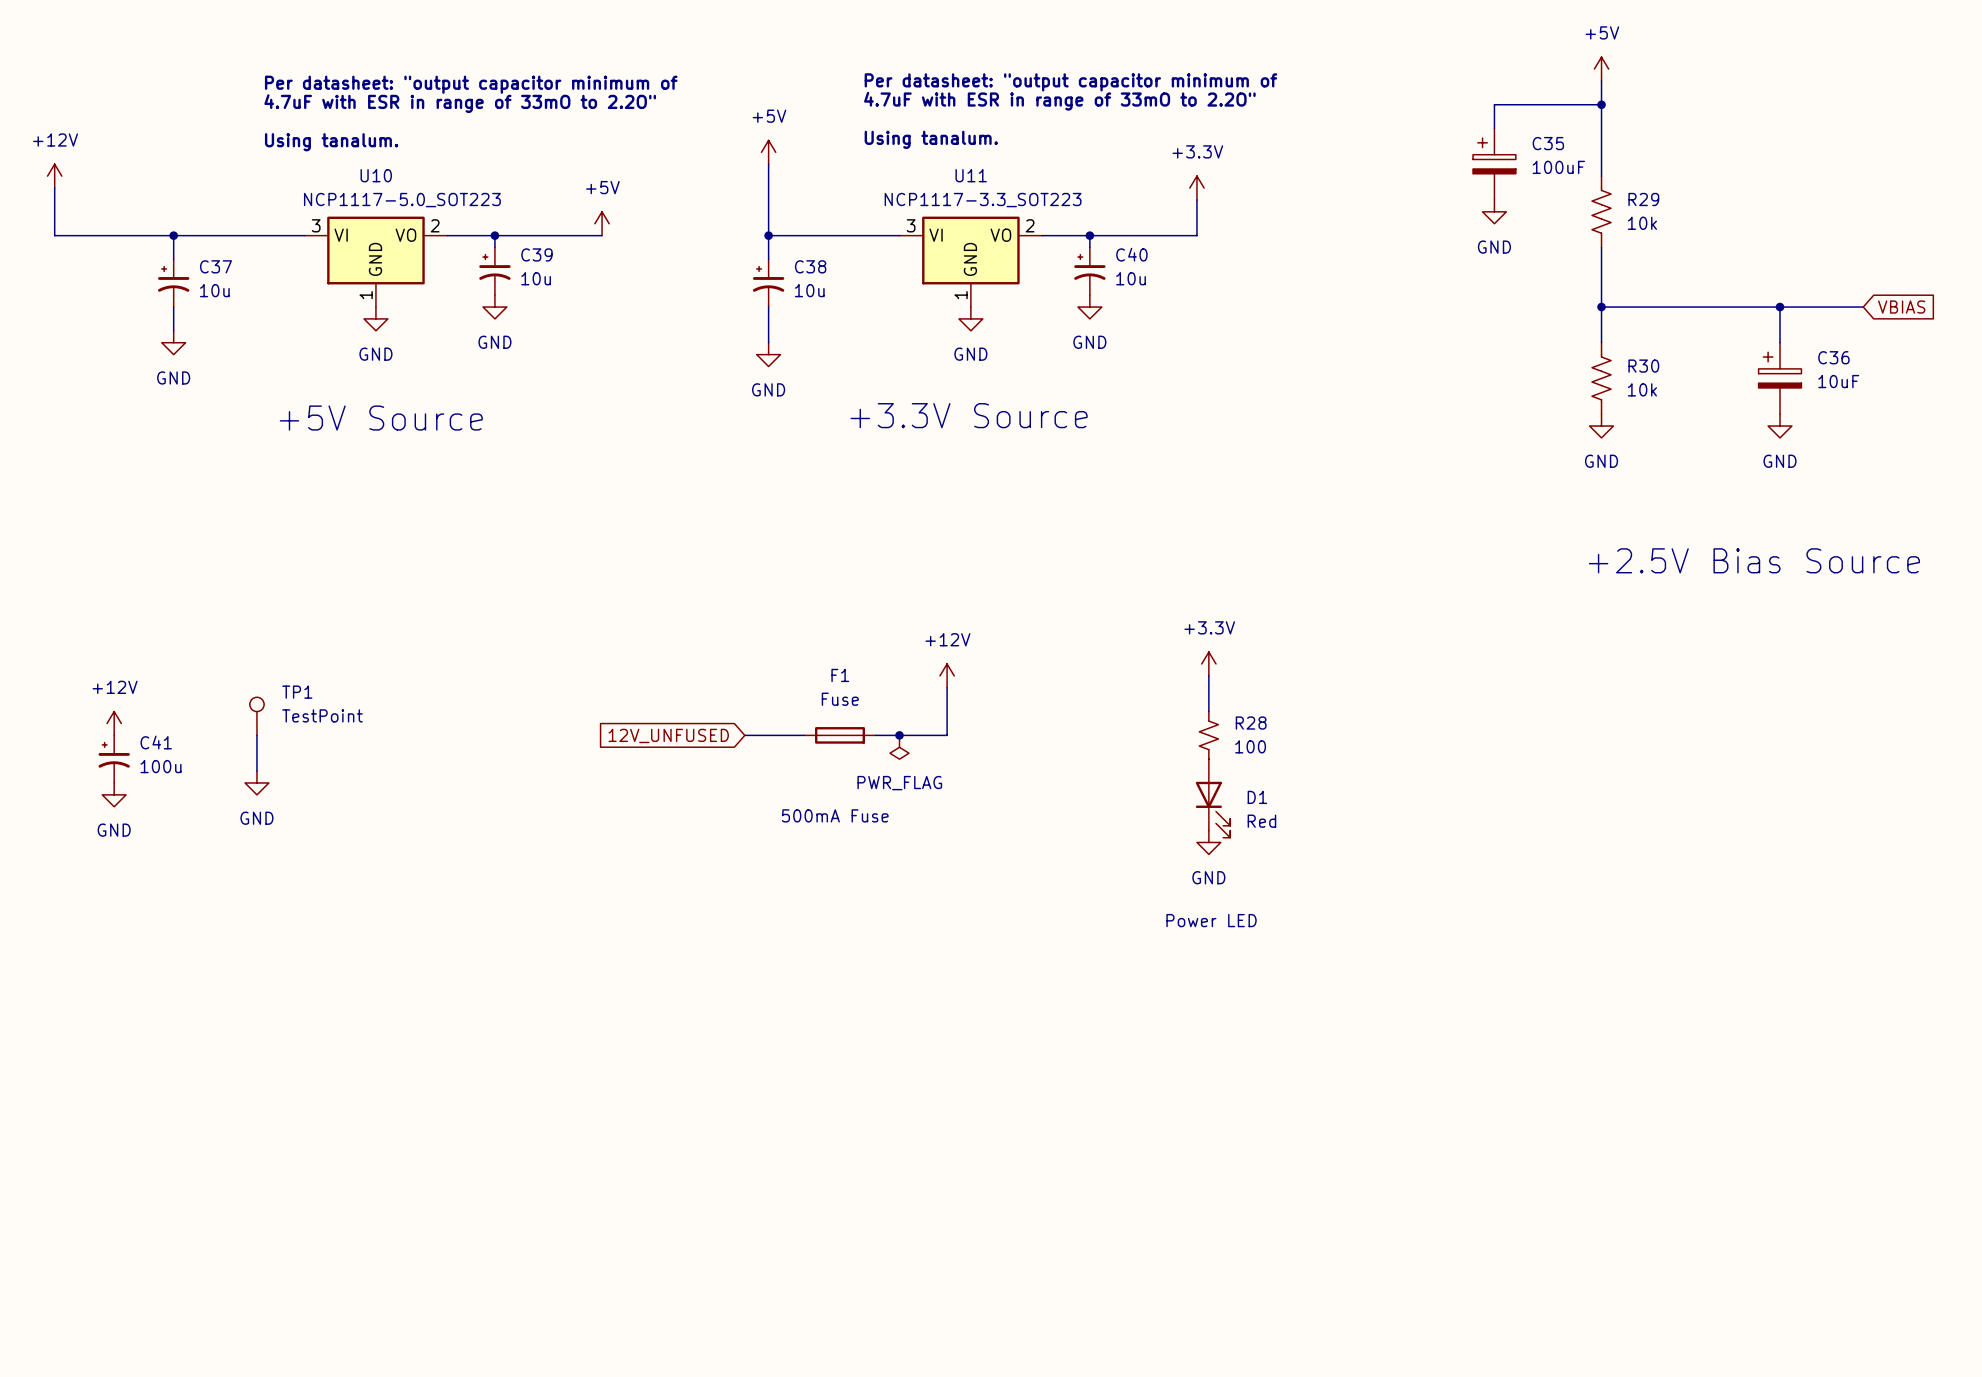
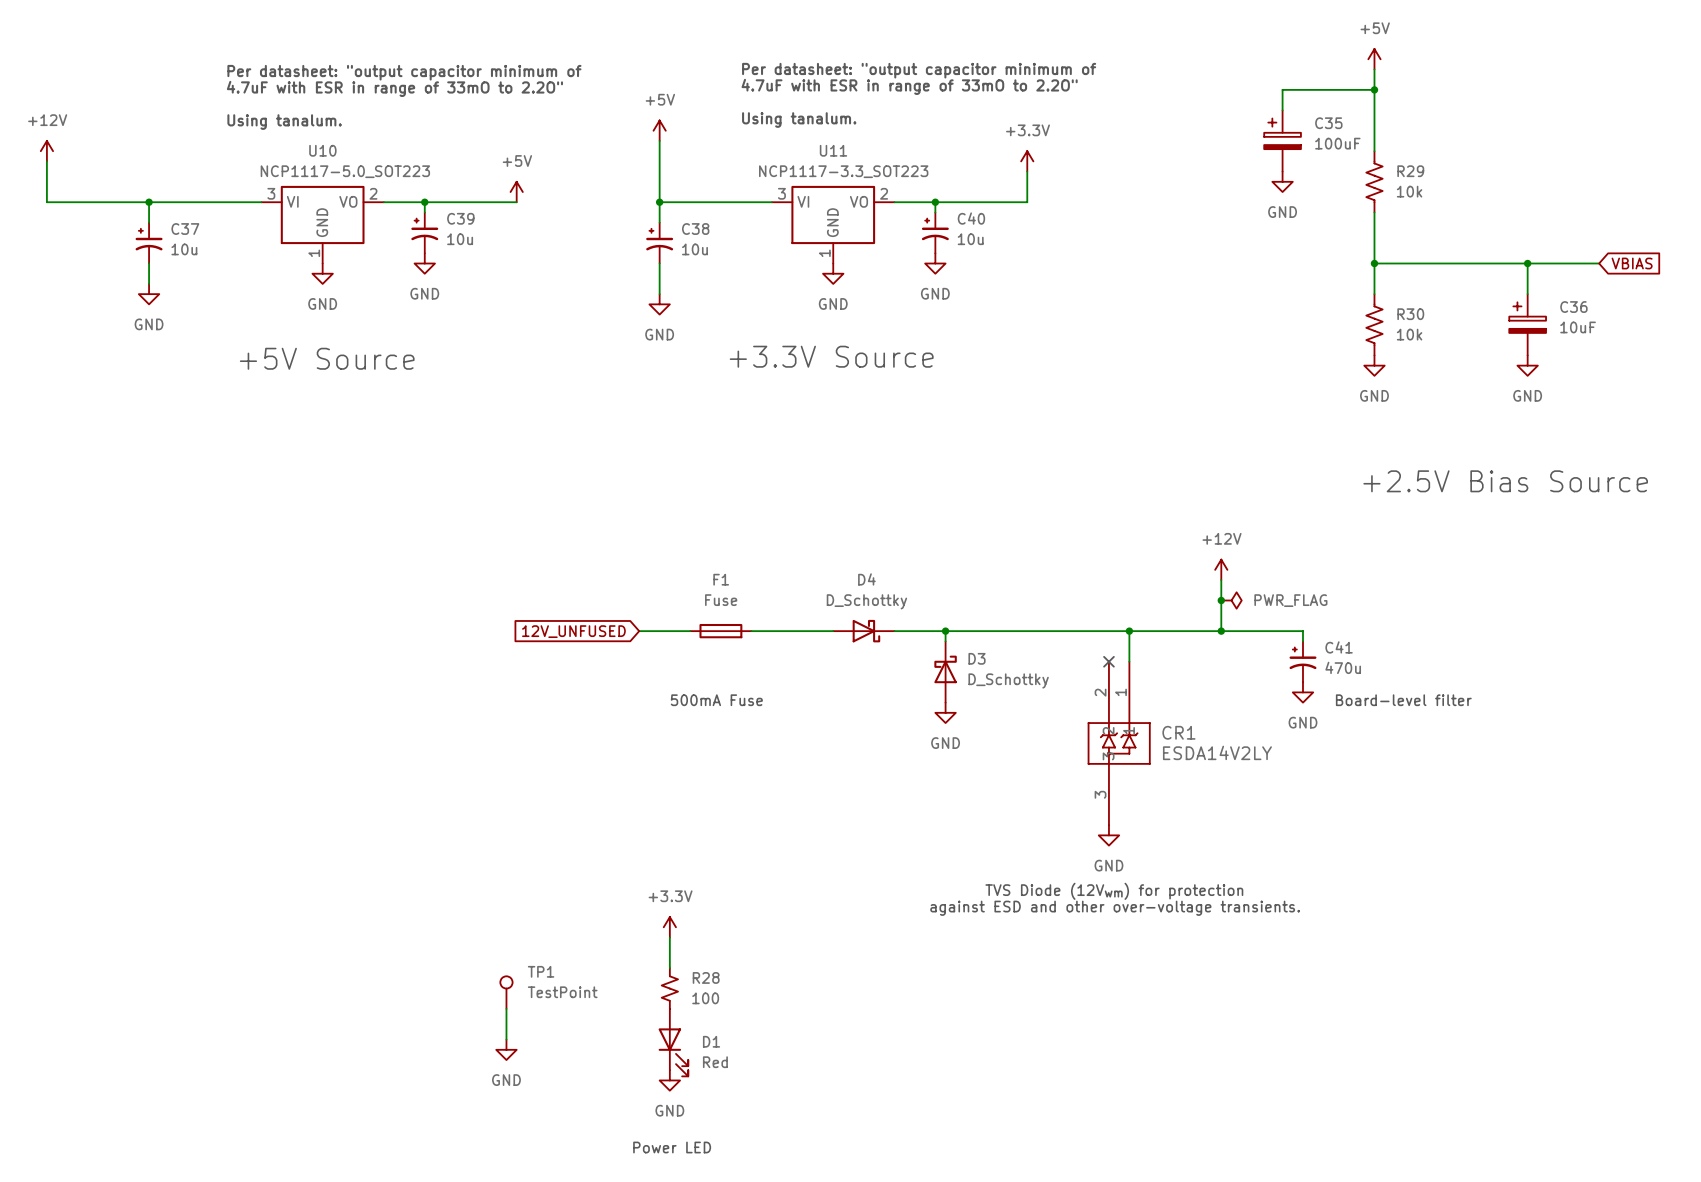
power symbol: +3.3V (1208, 663) -> none
power symbol: none -> +12V (1221, 569)
power symbol: +12V (947, 675) -> none
wire: (1208, 675) (1208, 711) -> (1129, 631) (1129, 661)
wire: none -> (1221, 580) (1221, 631)
wire: (947, 687) (947, 735) -> (833, 631) (812, 631)
junction: none -> (1221, 600)
power symbol: none -> PWR_FLAG (1231, 600)
TP1 position: (256, 716) -> (506, 992)
power symbol: +12V (114, 723) -> none
wire: (256, 735) (256, 771) -> none
junction: (899, 735) -> none
D4: none -> D_Schottky (863, 631)
wire: none -> (894, 631) (1302, 631) (1302, 641)
wire: none -> (945, 631) (945, 641)
junction: none -> (945, 631)
R28 position: (1208, 735) -> (669, 988)
junction: none -> (1129, 631)
junction: none -> (1221, 631)
power symbol: PWR_FLAG (899, 747) -> none
C41 position: (114, 759) -> (1302, 661)
C41 value: 100u (161, 766) -> 470u (1343, 667)
no-connect mark: none -> (1108, 661)
power symbol: GND (256, 782) -> none
D3: none -> D_Schottky (945, 671)
power symbol: GND (114, 794) -> none
D1 position: (1213, 798) -> (673, 1042)
power symbol: none -> GND (1302, 692)
text: none -> Board-level filter (1403, 700)
power symbol: none -> GND (945, 712)
power symbol: GND (1208, 842) -> none
CR1: none -> ESDA14V2LY (1119, 743)
text: Power LED (1211, 920) -> none
power symbol: none -> GND (1108, 835)
text: none -> TVS Diode (12Vwm) for protection (1114, 891)
text: none -> against ESD and other over-voltage transients. (1115, 908)
power symbol: none -> +3.3V (669, 927)
wire: none -> (669, 937) (669, 968)
wire: none -> (506, 1008) (506, 1039)
power symbol: none -> GND (506, 1049)
power symbol: none -> GND (669, 1080)
text: none -> Power LED (672, 1147)

